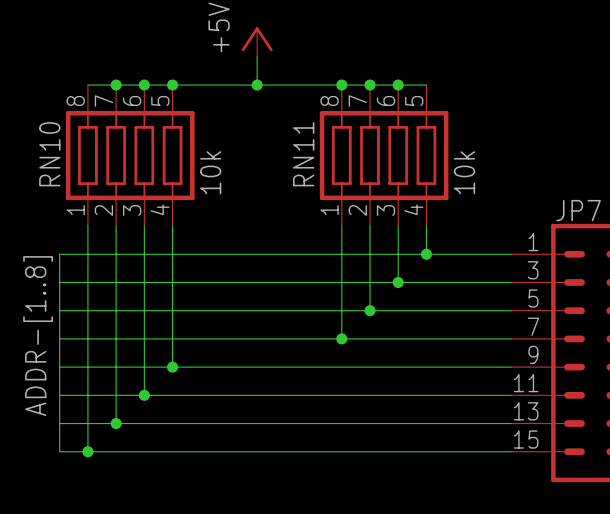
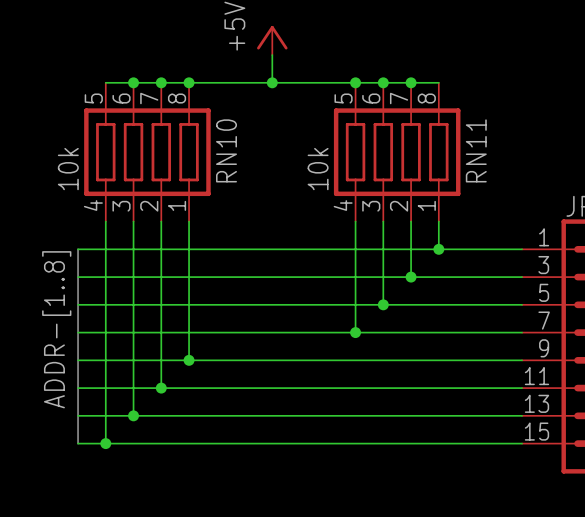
RN10 flip: as is (130, 155) -> left-right (147, 152)
RN11 flip: as is (384, 155) -> left-right (397, 152)

